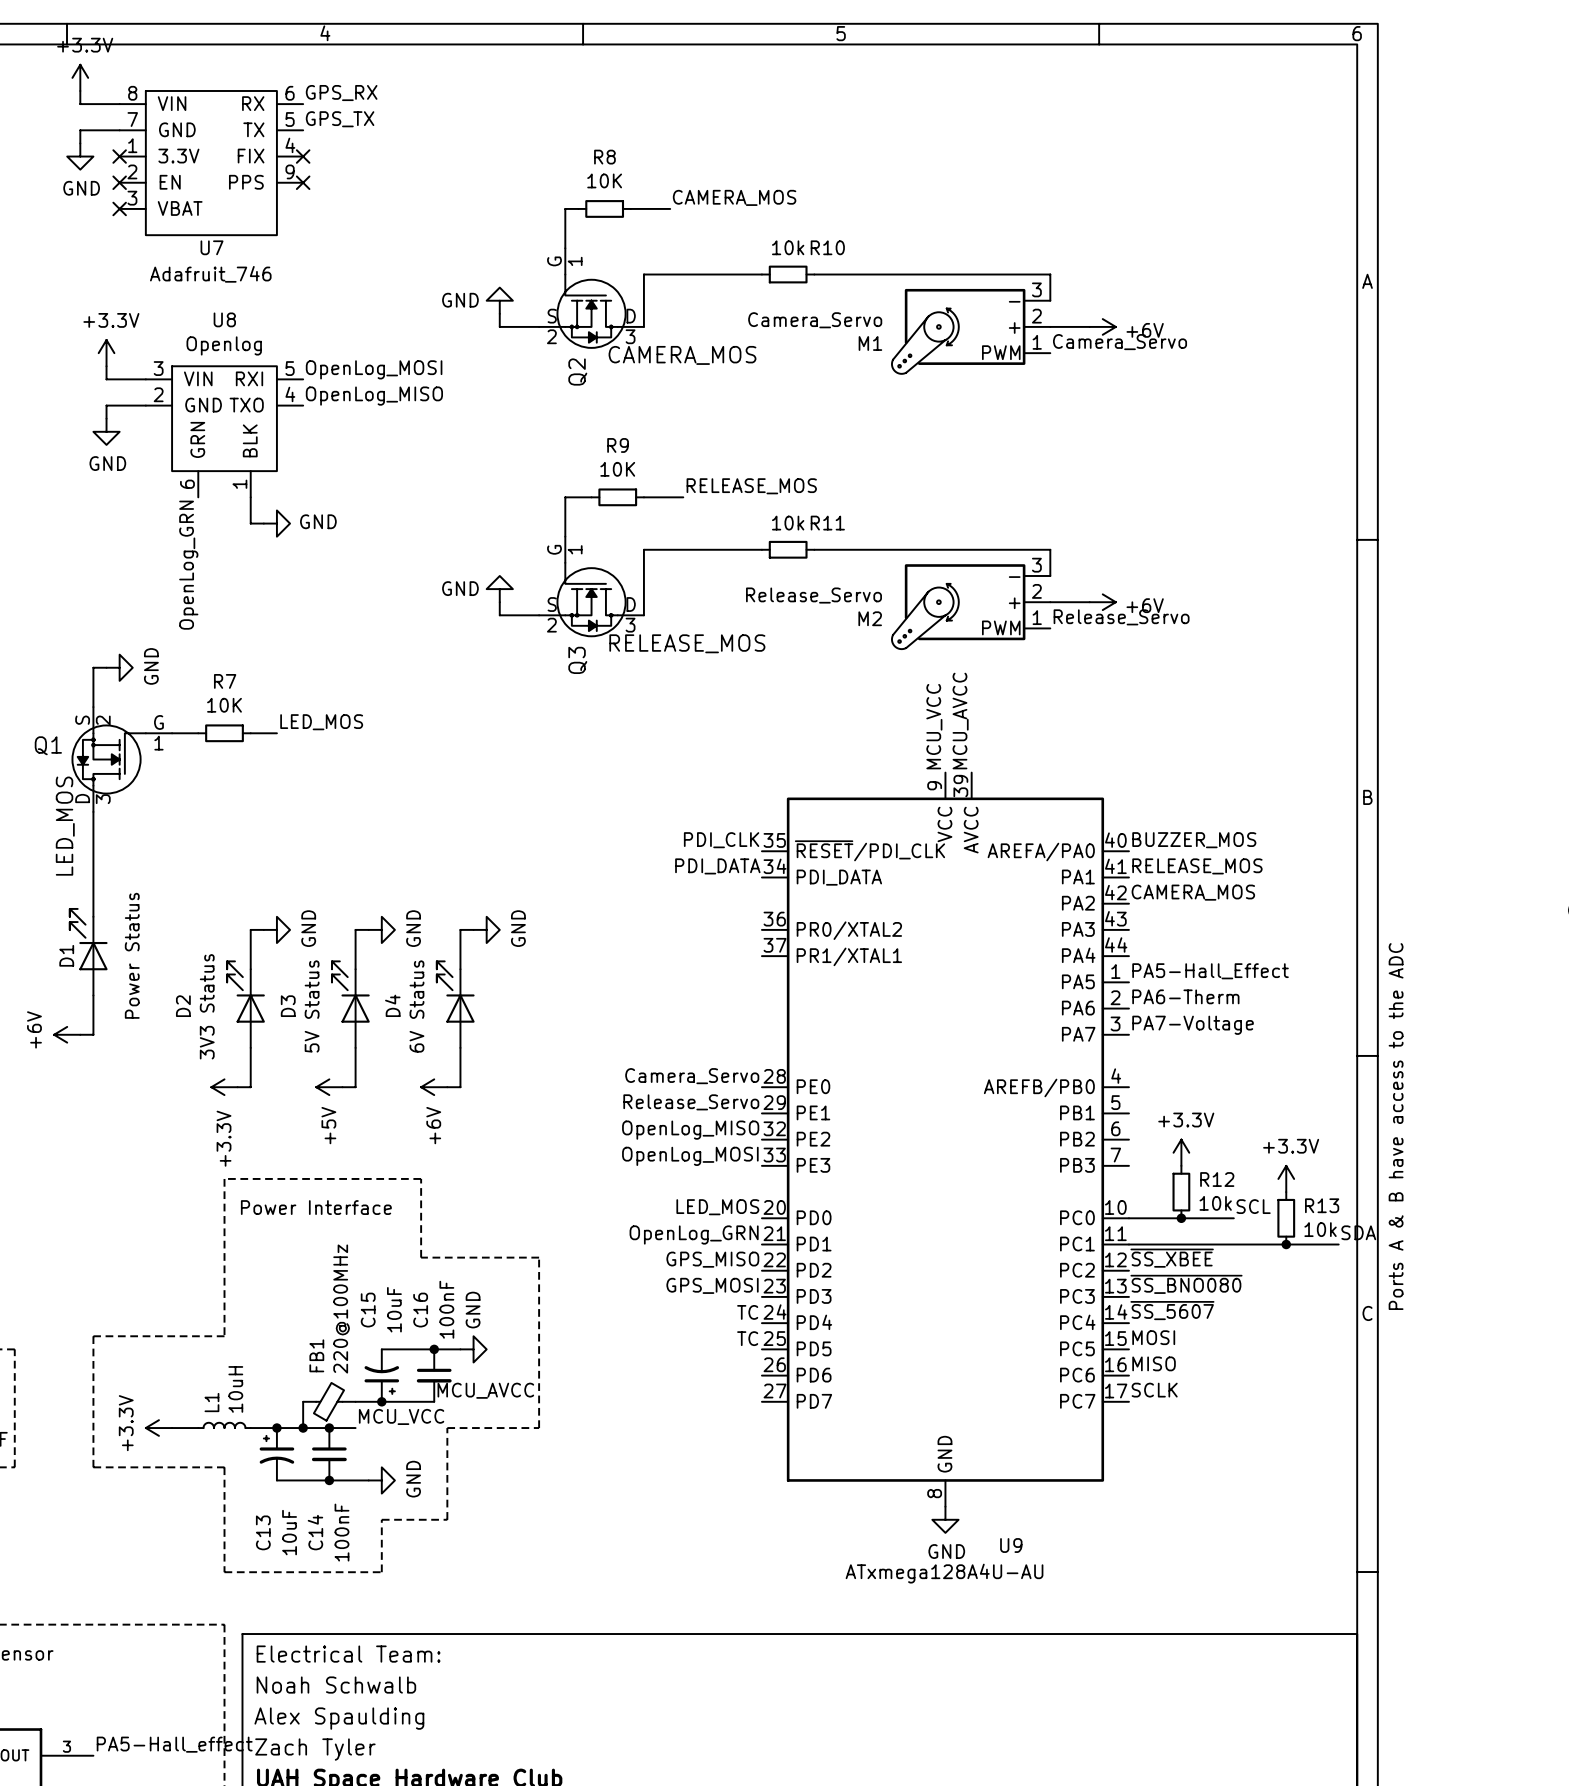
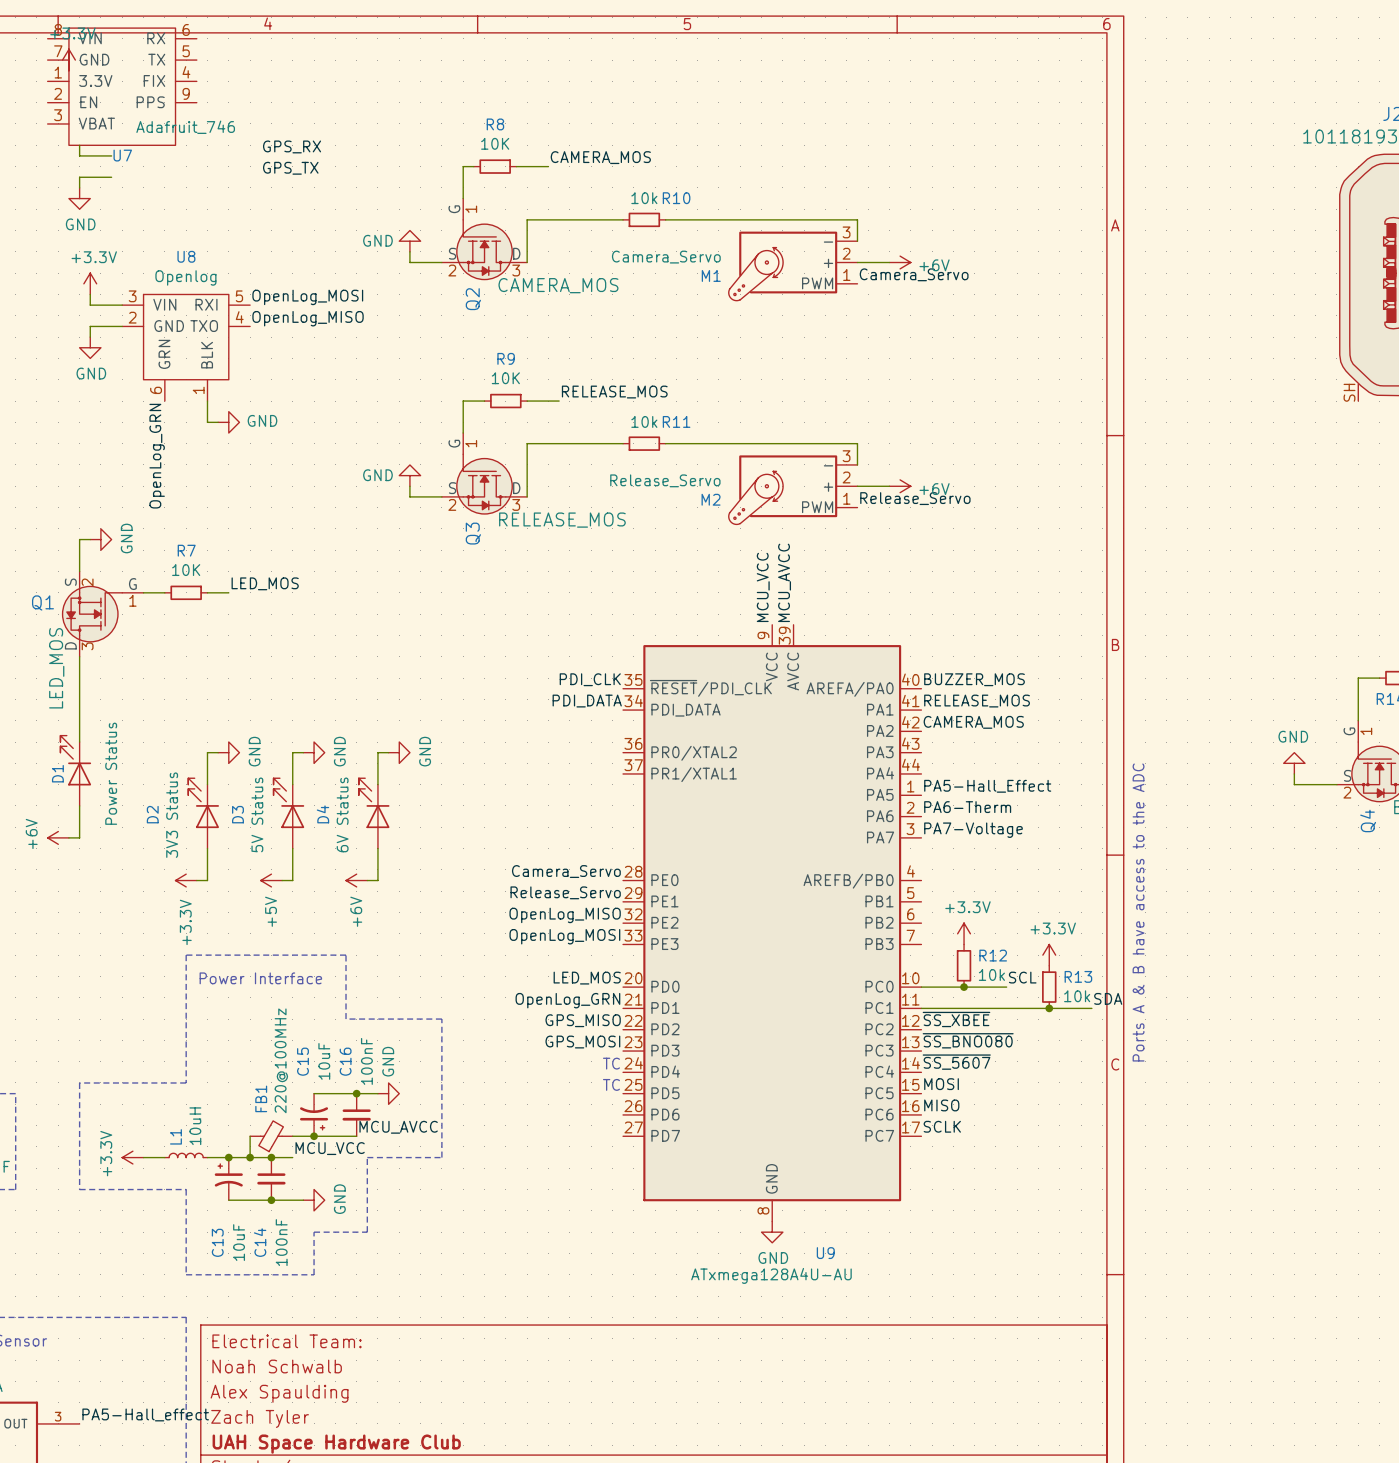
wire: (80, 90) (80, 104) (119, 104) -> (79, 145) (79, 155) (111, 155)
label position: GPS_RX (341, 93) -> GPS_RX (292, 146)
label position: GPS_TX (340, 119) -> GPS_TX (290, 168)
wire: (119, 130) (80, 130) (80, 143) -> (111, 177) (79, 177) (79, 187)
power symbol position: GND (80, 156) -> GND (79, 198)
no-connect mark: (119, 156) -> none
no-connect mark: (303, 156) -> none
U7 position: (211, 163) -> (122, 86)
no-connect mark: (119, 182) -> none
no-connect mark: (303, 182) -> none
no-connect mark: (119, 208) -> none
U7 value position: Adafruit_746 (210, 274) -> Adafruit_746 (185, 127)

